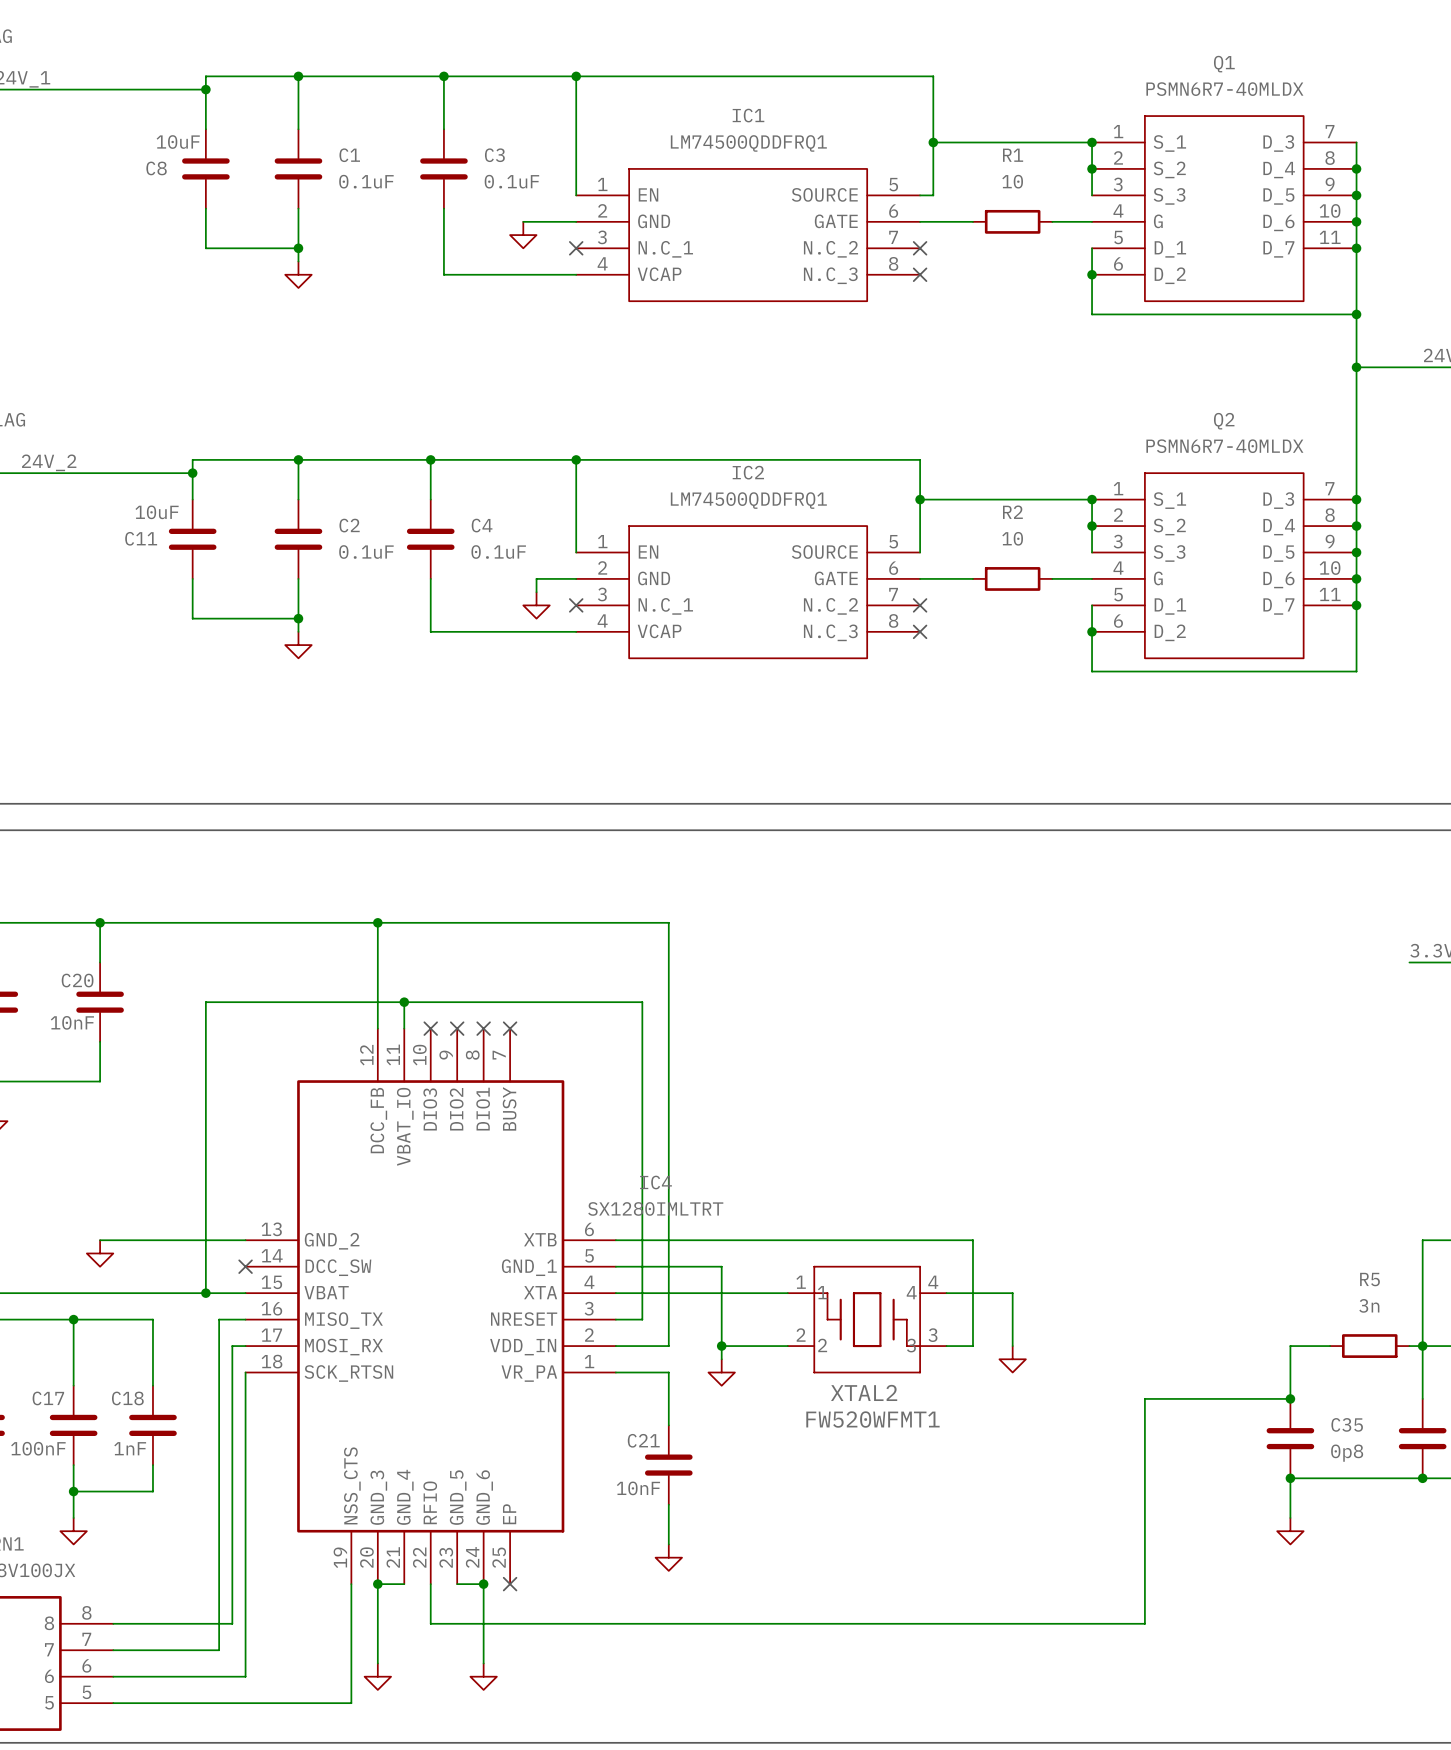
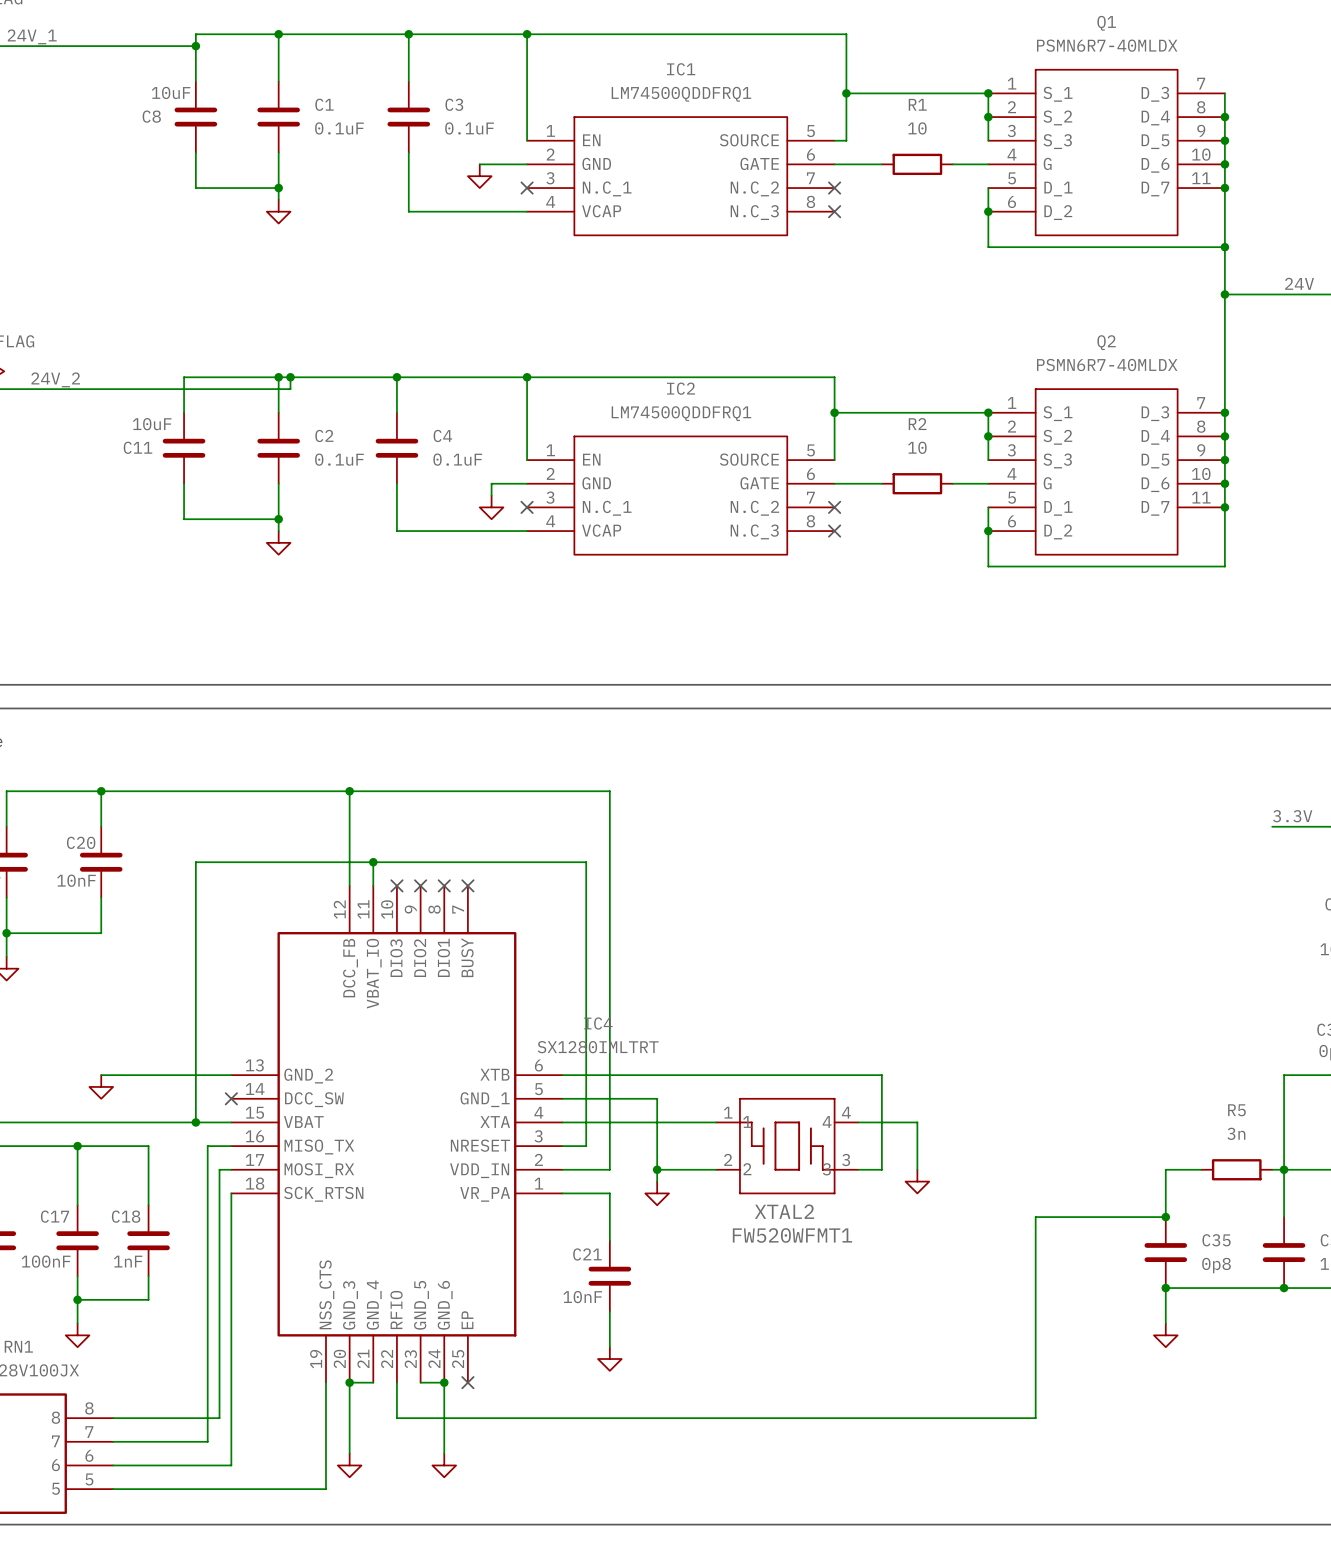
wire: none -> (290, 377) (290, 389) (184, 389)
junction: none -> (290, 377)
junction: (192, 473) -> none

